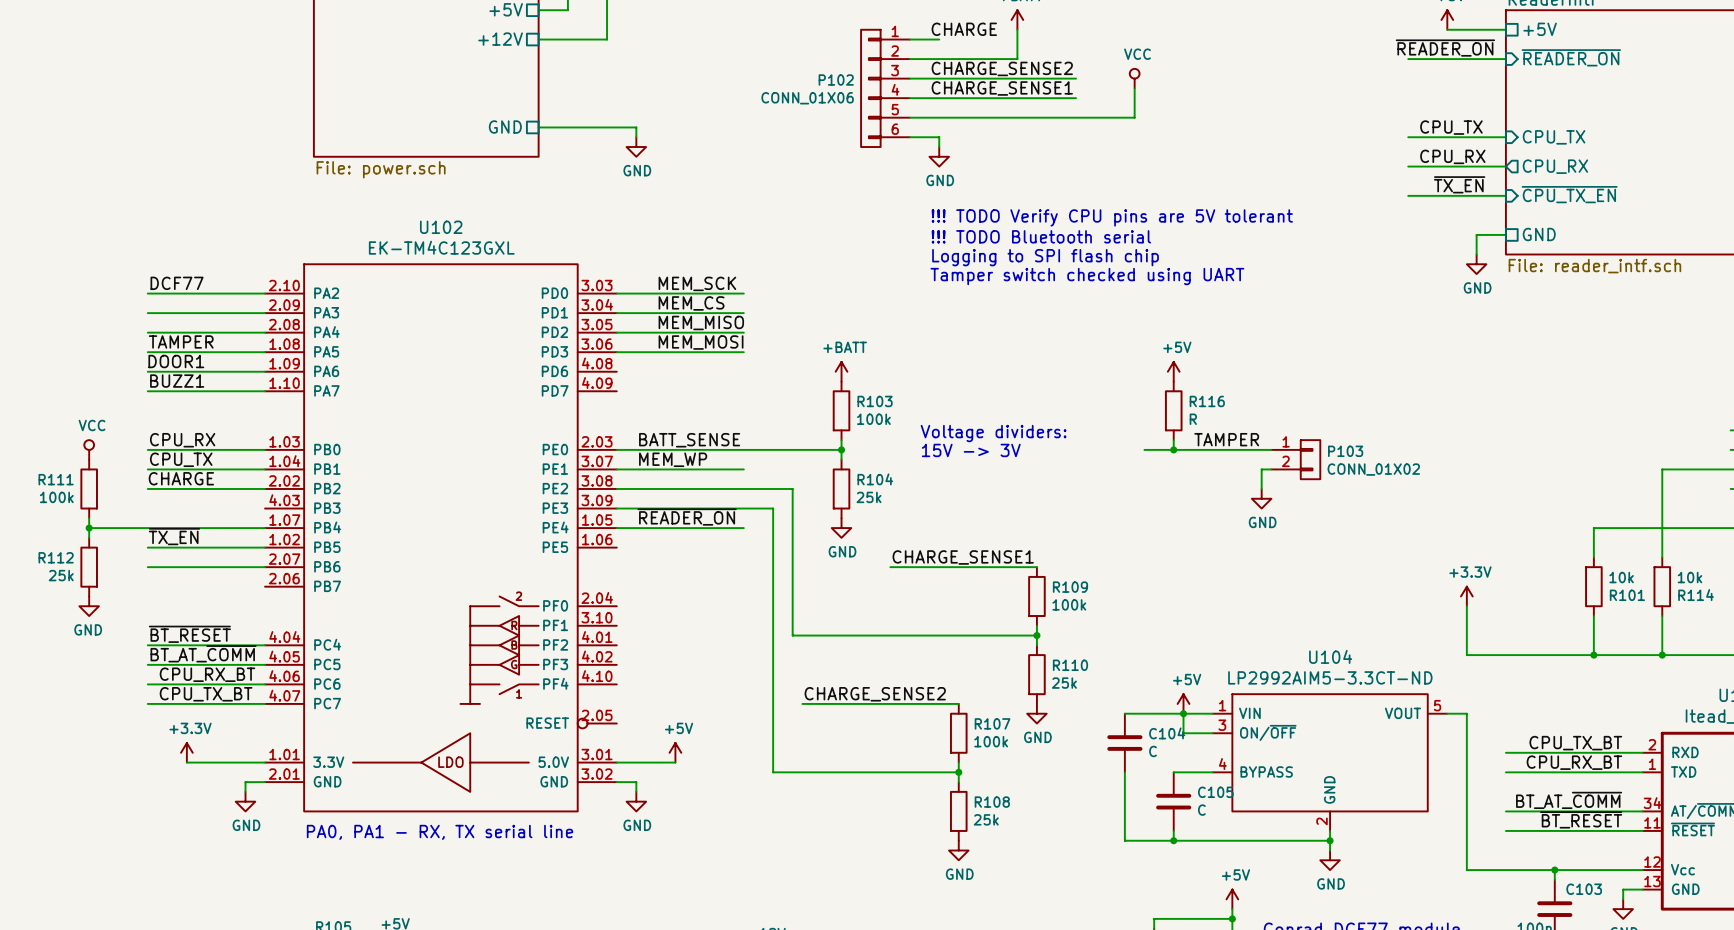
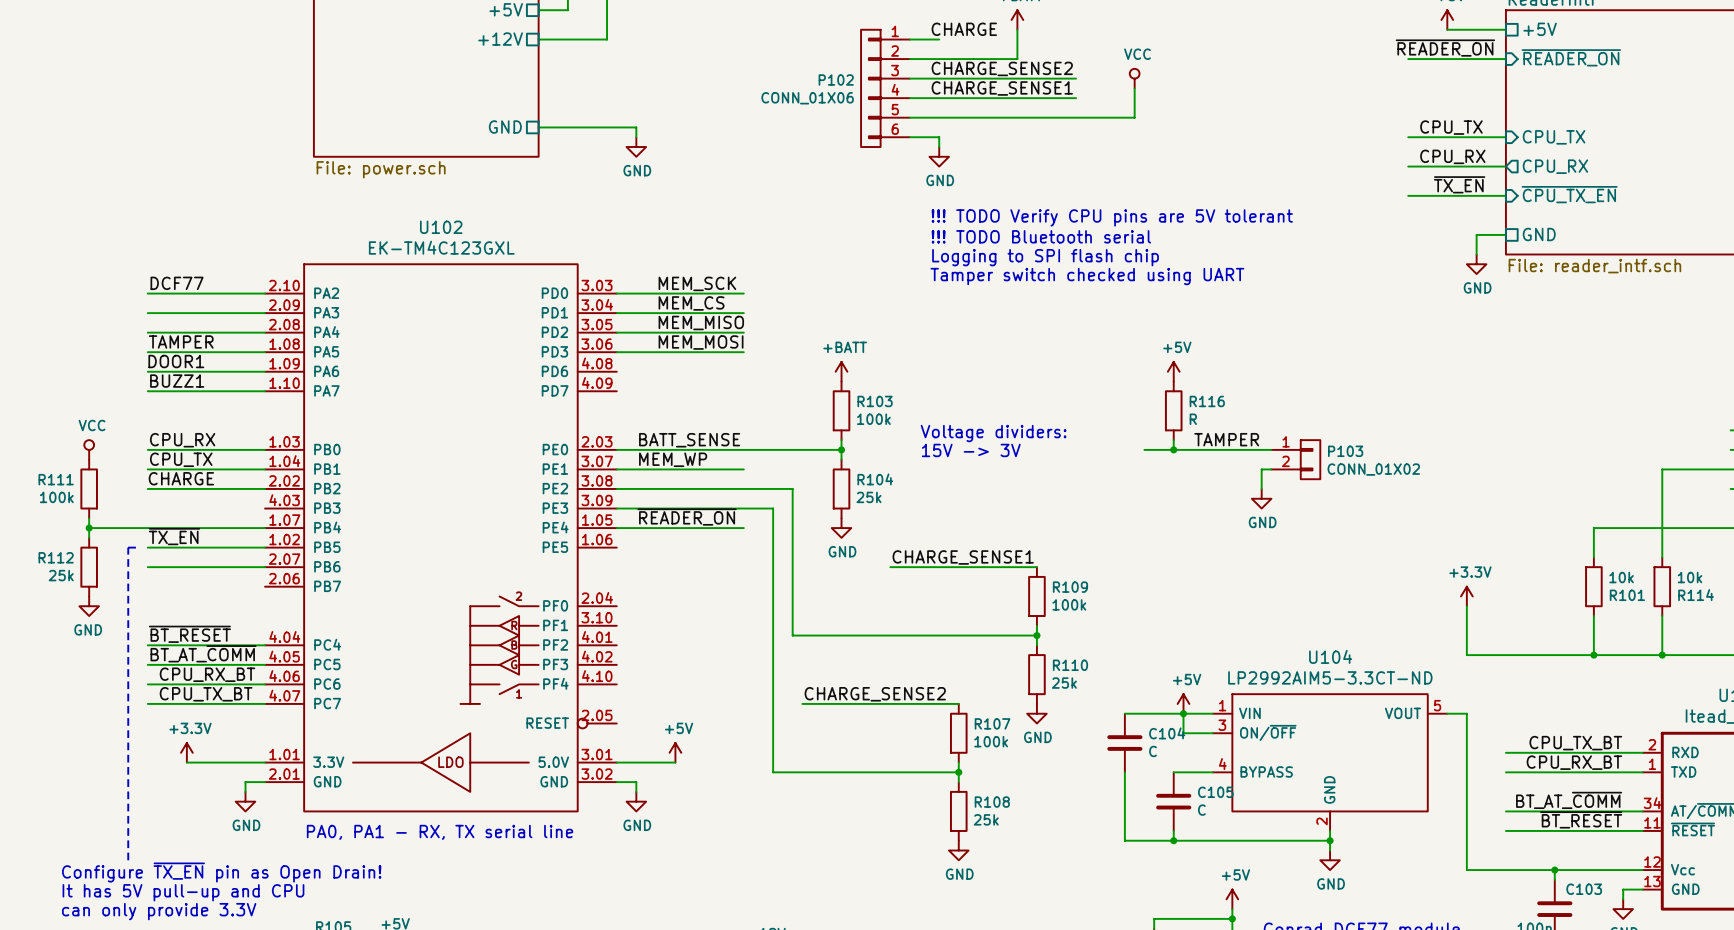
line: none -> (138, 547) (128, 547) (128, 860)
text: none -> Configure ~{TX_EN} pin as Open Drain! (221, 872)
text: none -> It has 5V pull-up and CPU (183, 892)
text: none -> can only provide 3.3V (159, 911)

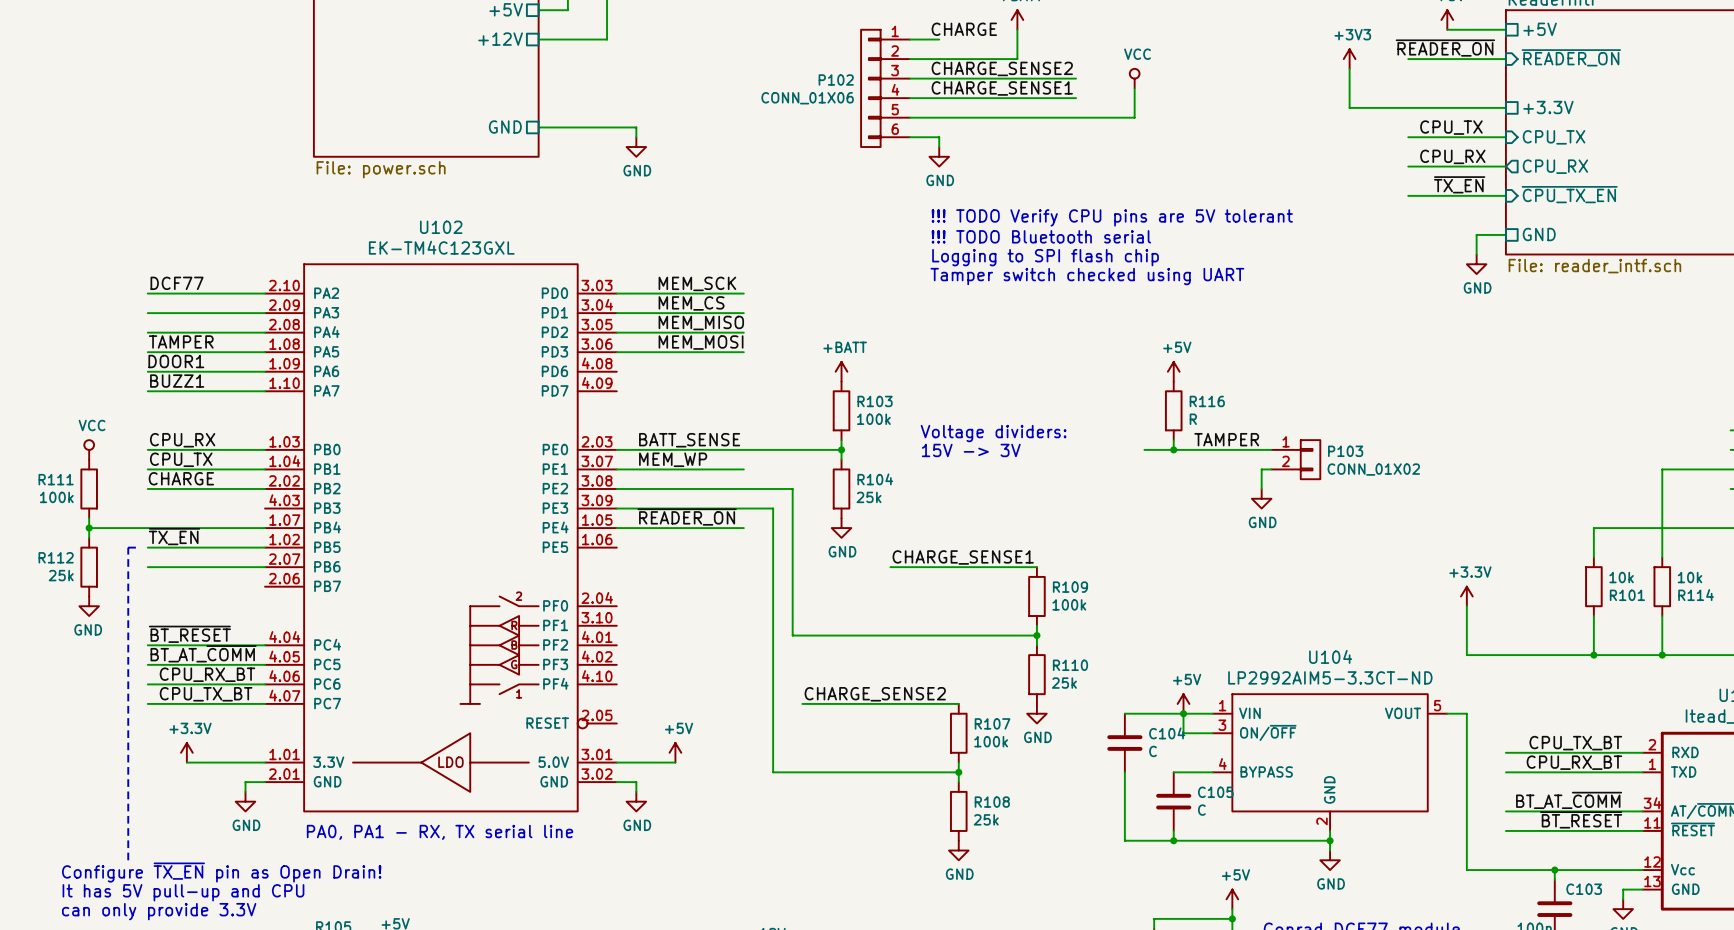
power symbol: none -> +3V3 (1349, 59)
wire: none -> (1349, 68) (1349, 107) (1505, 107)
sheet pin: none -> +3.3V (1548, 107)

